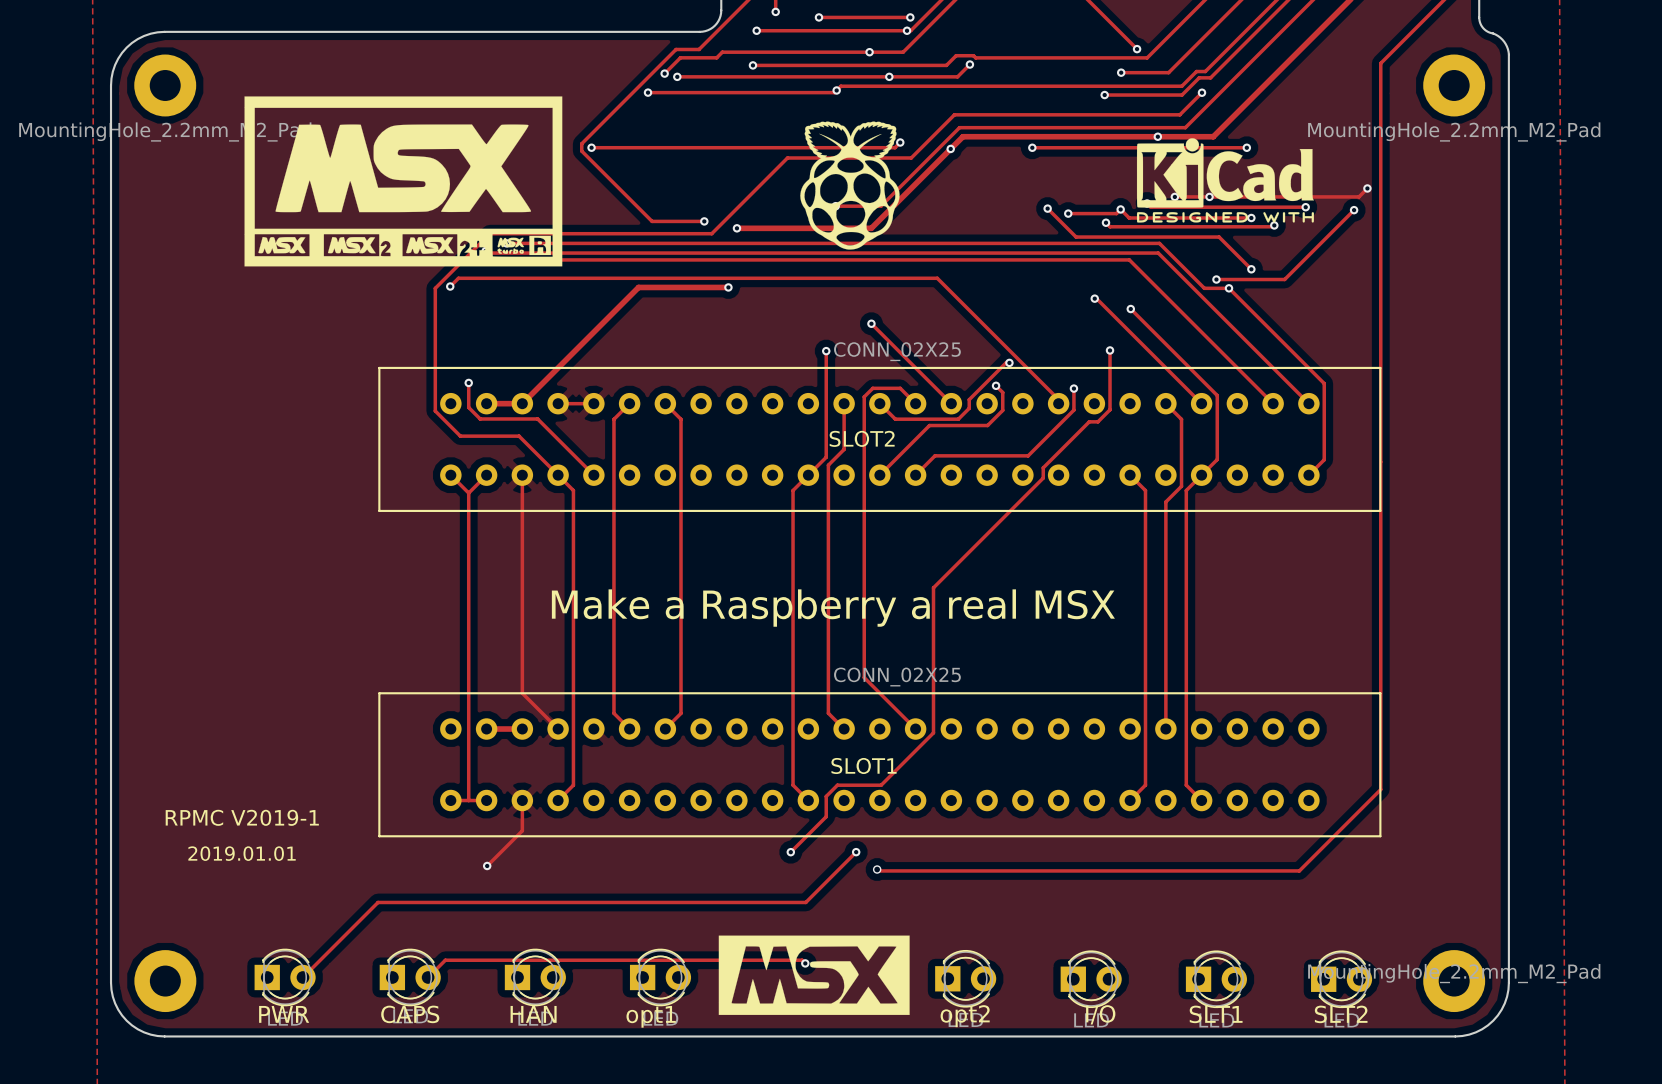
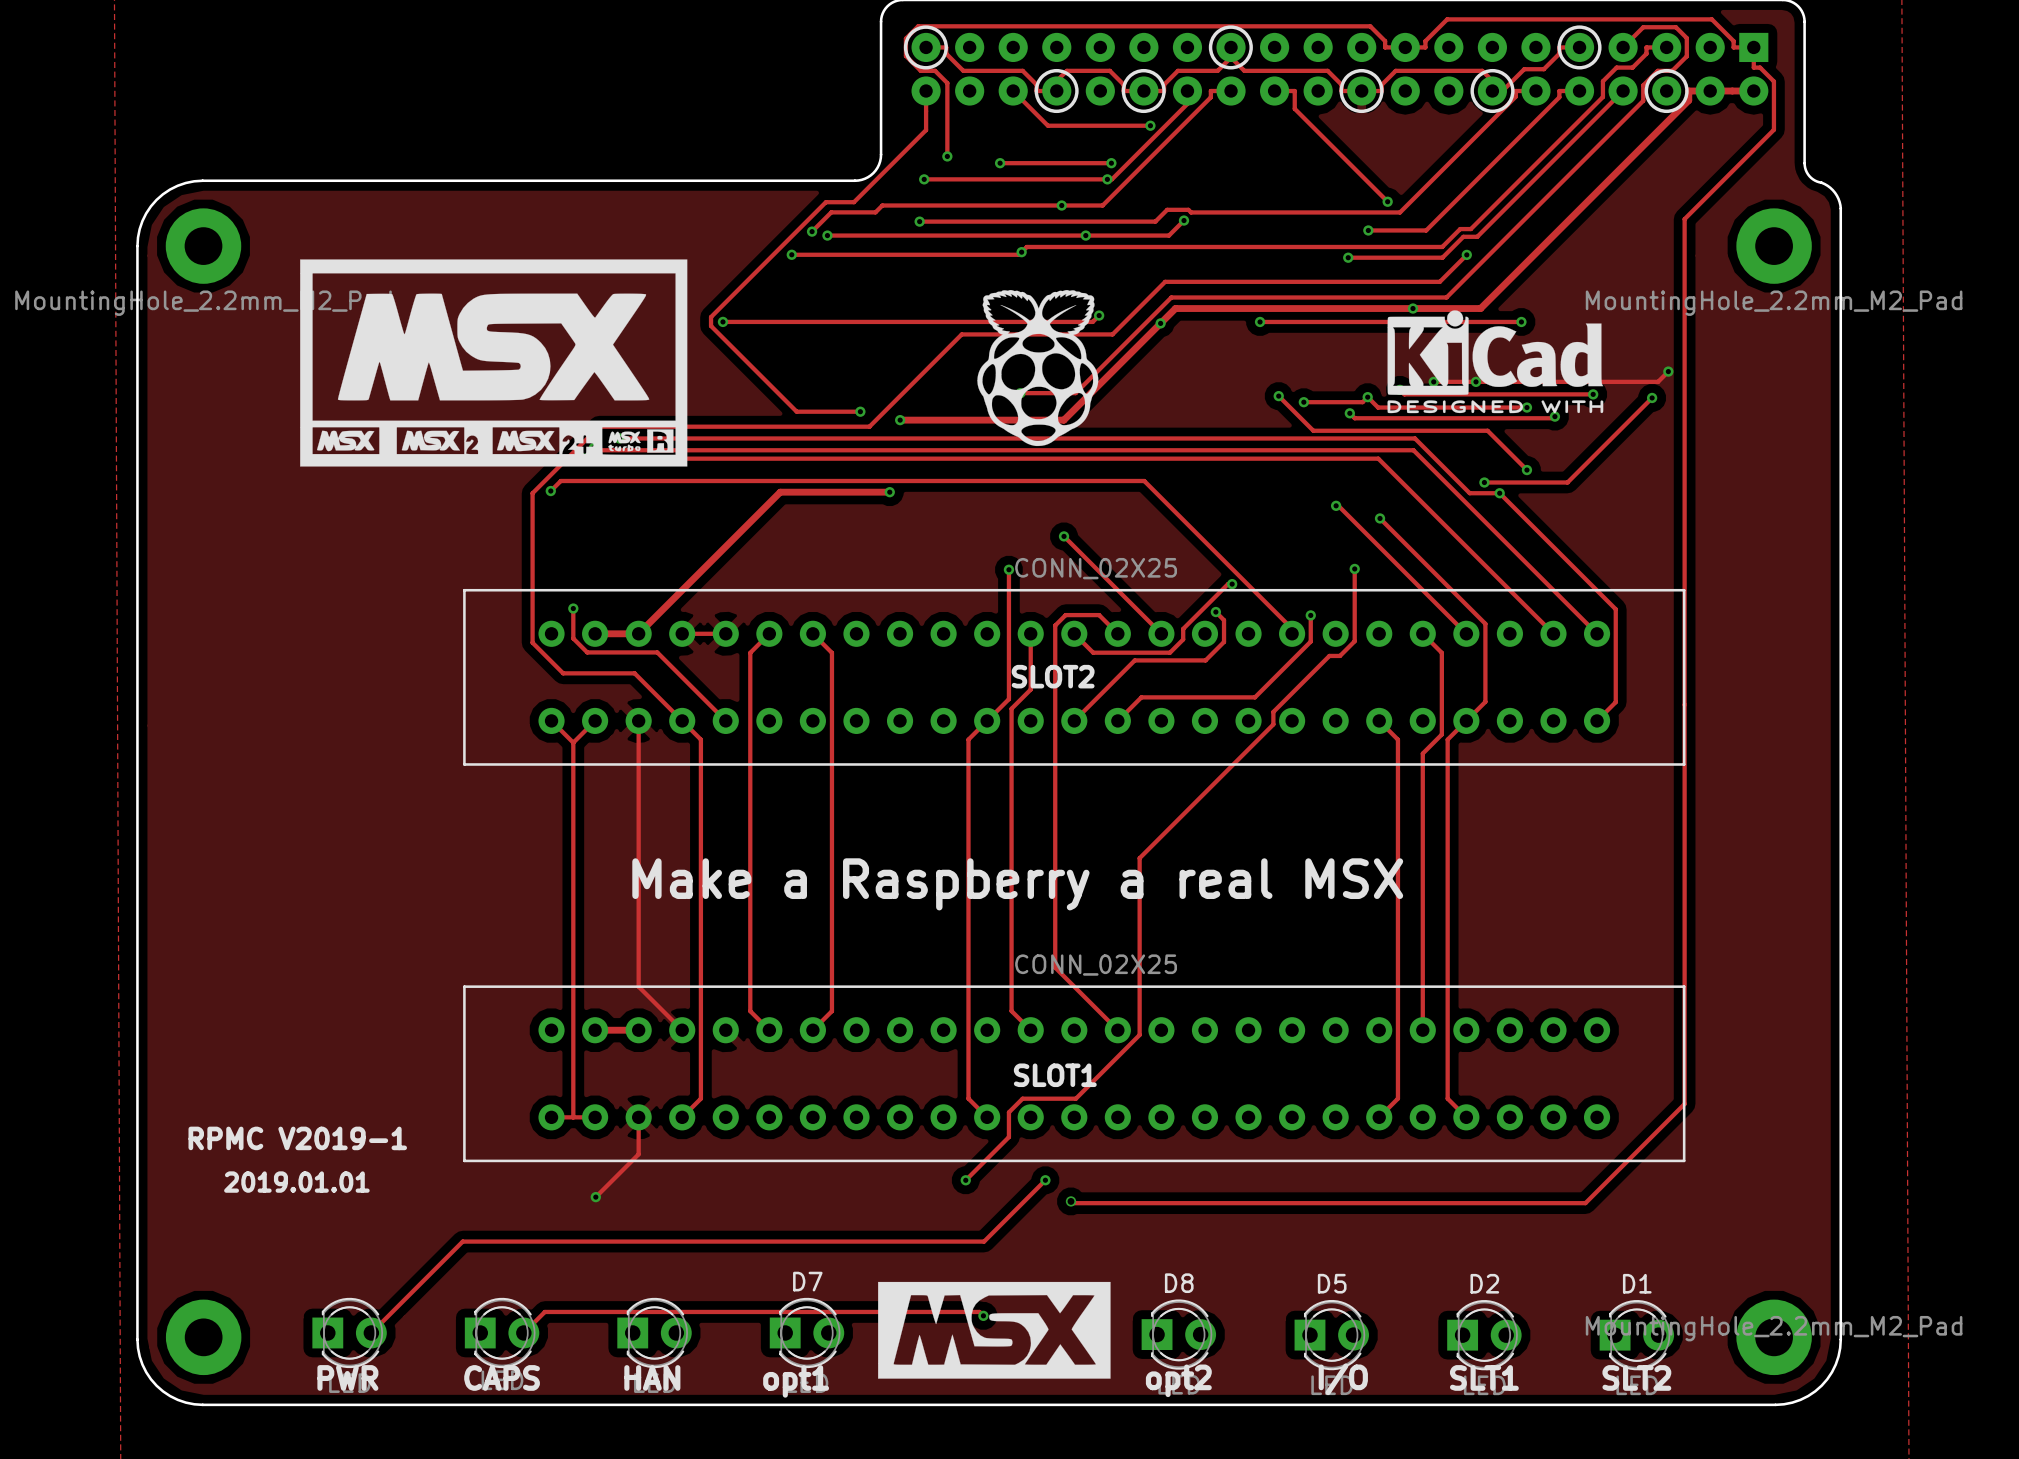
D7 name: none -> D7 (807, 1281)
D8 name: none -> D8 (1179, 1283)
D2 name: none -> D2 (1484, 1283)
D5 name: none -> D5 (1332, 1283)
D1 name: none -> D1 (1637, 1283)

